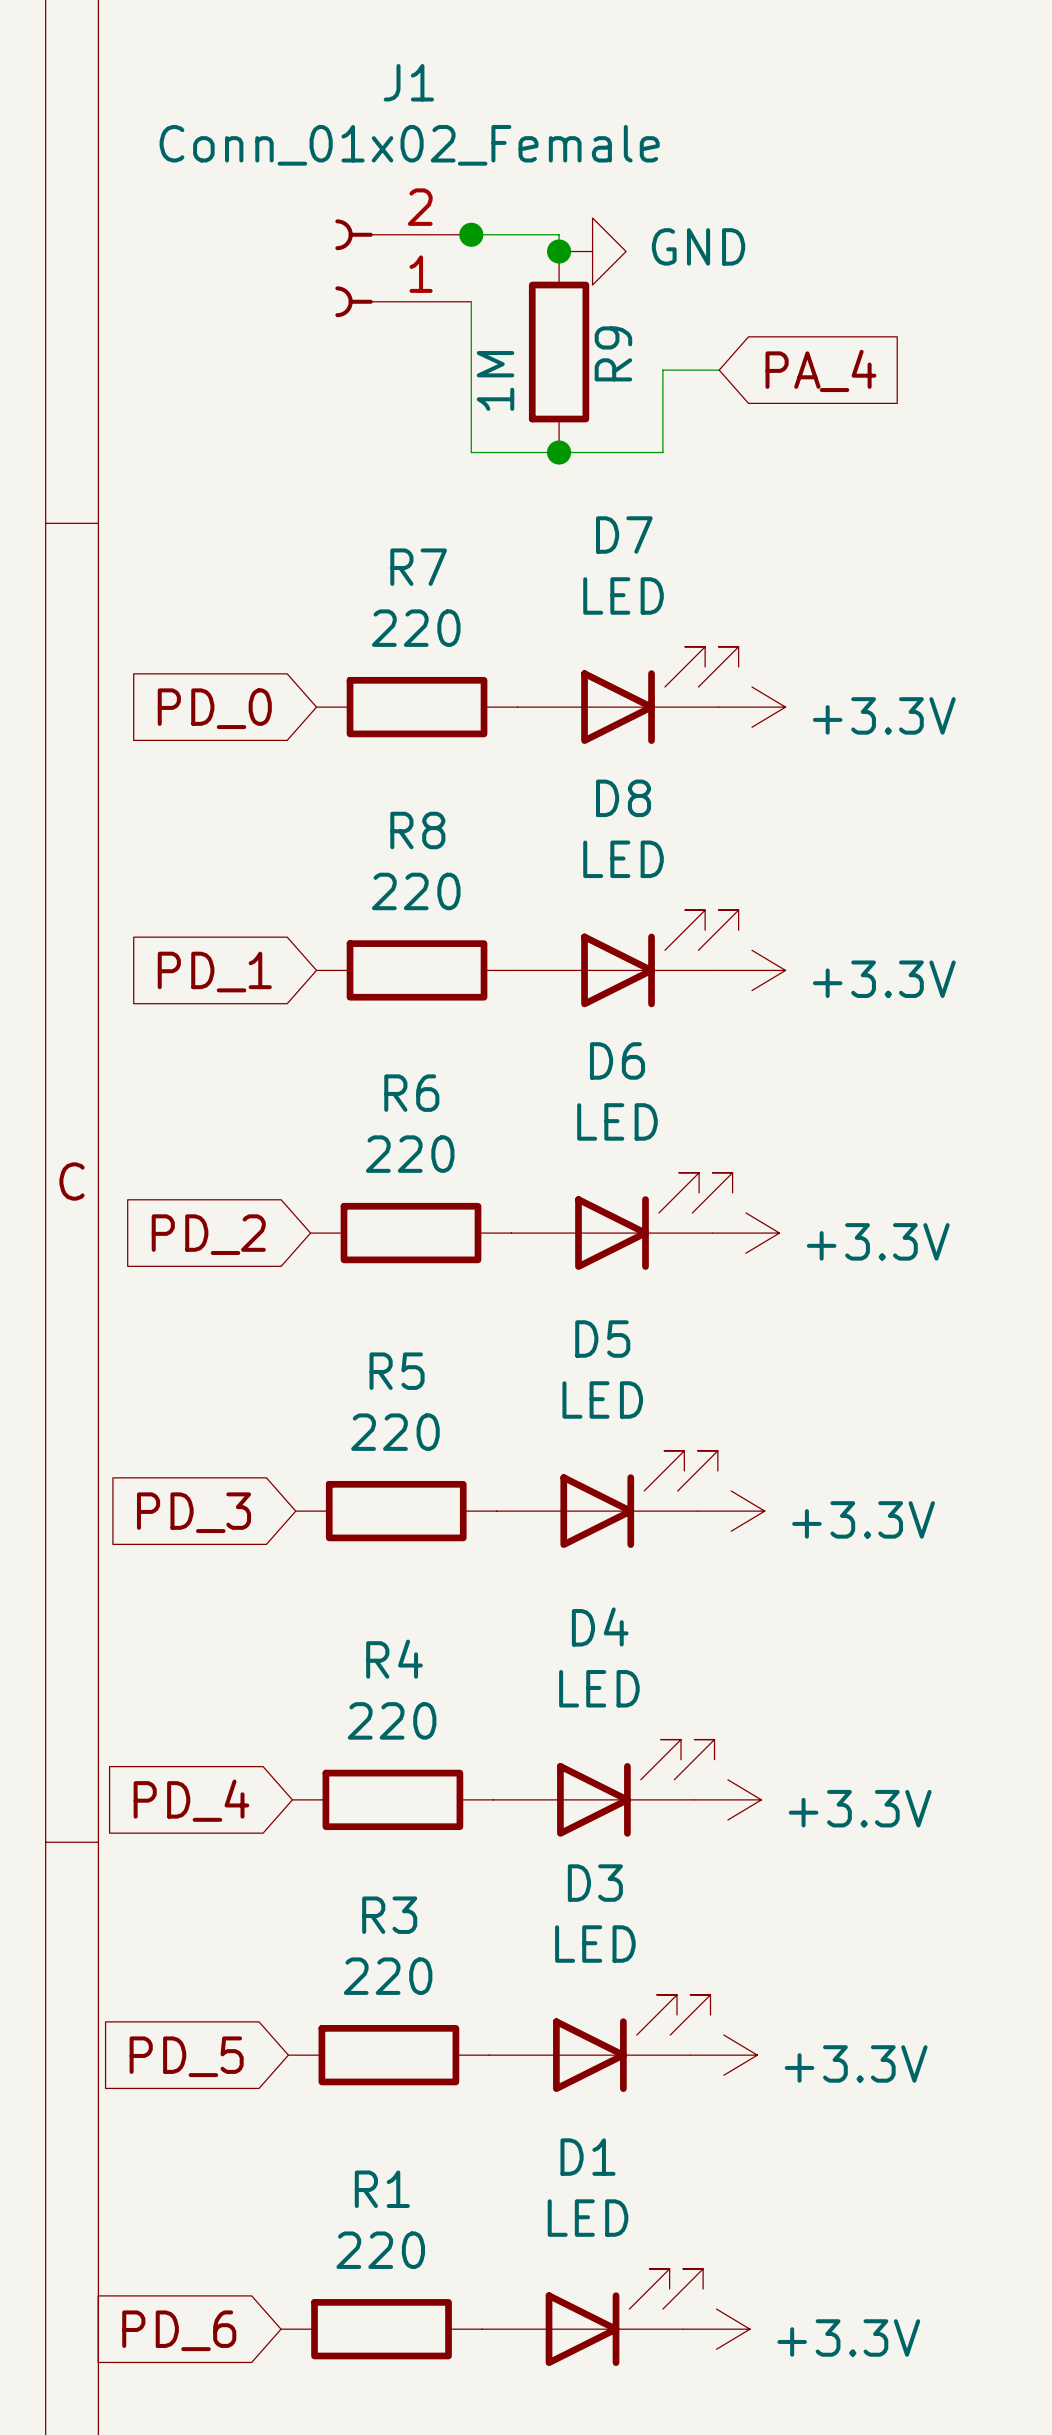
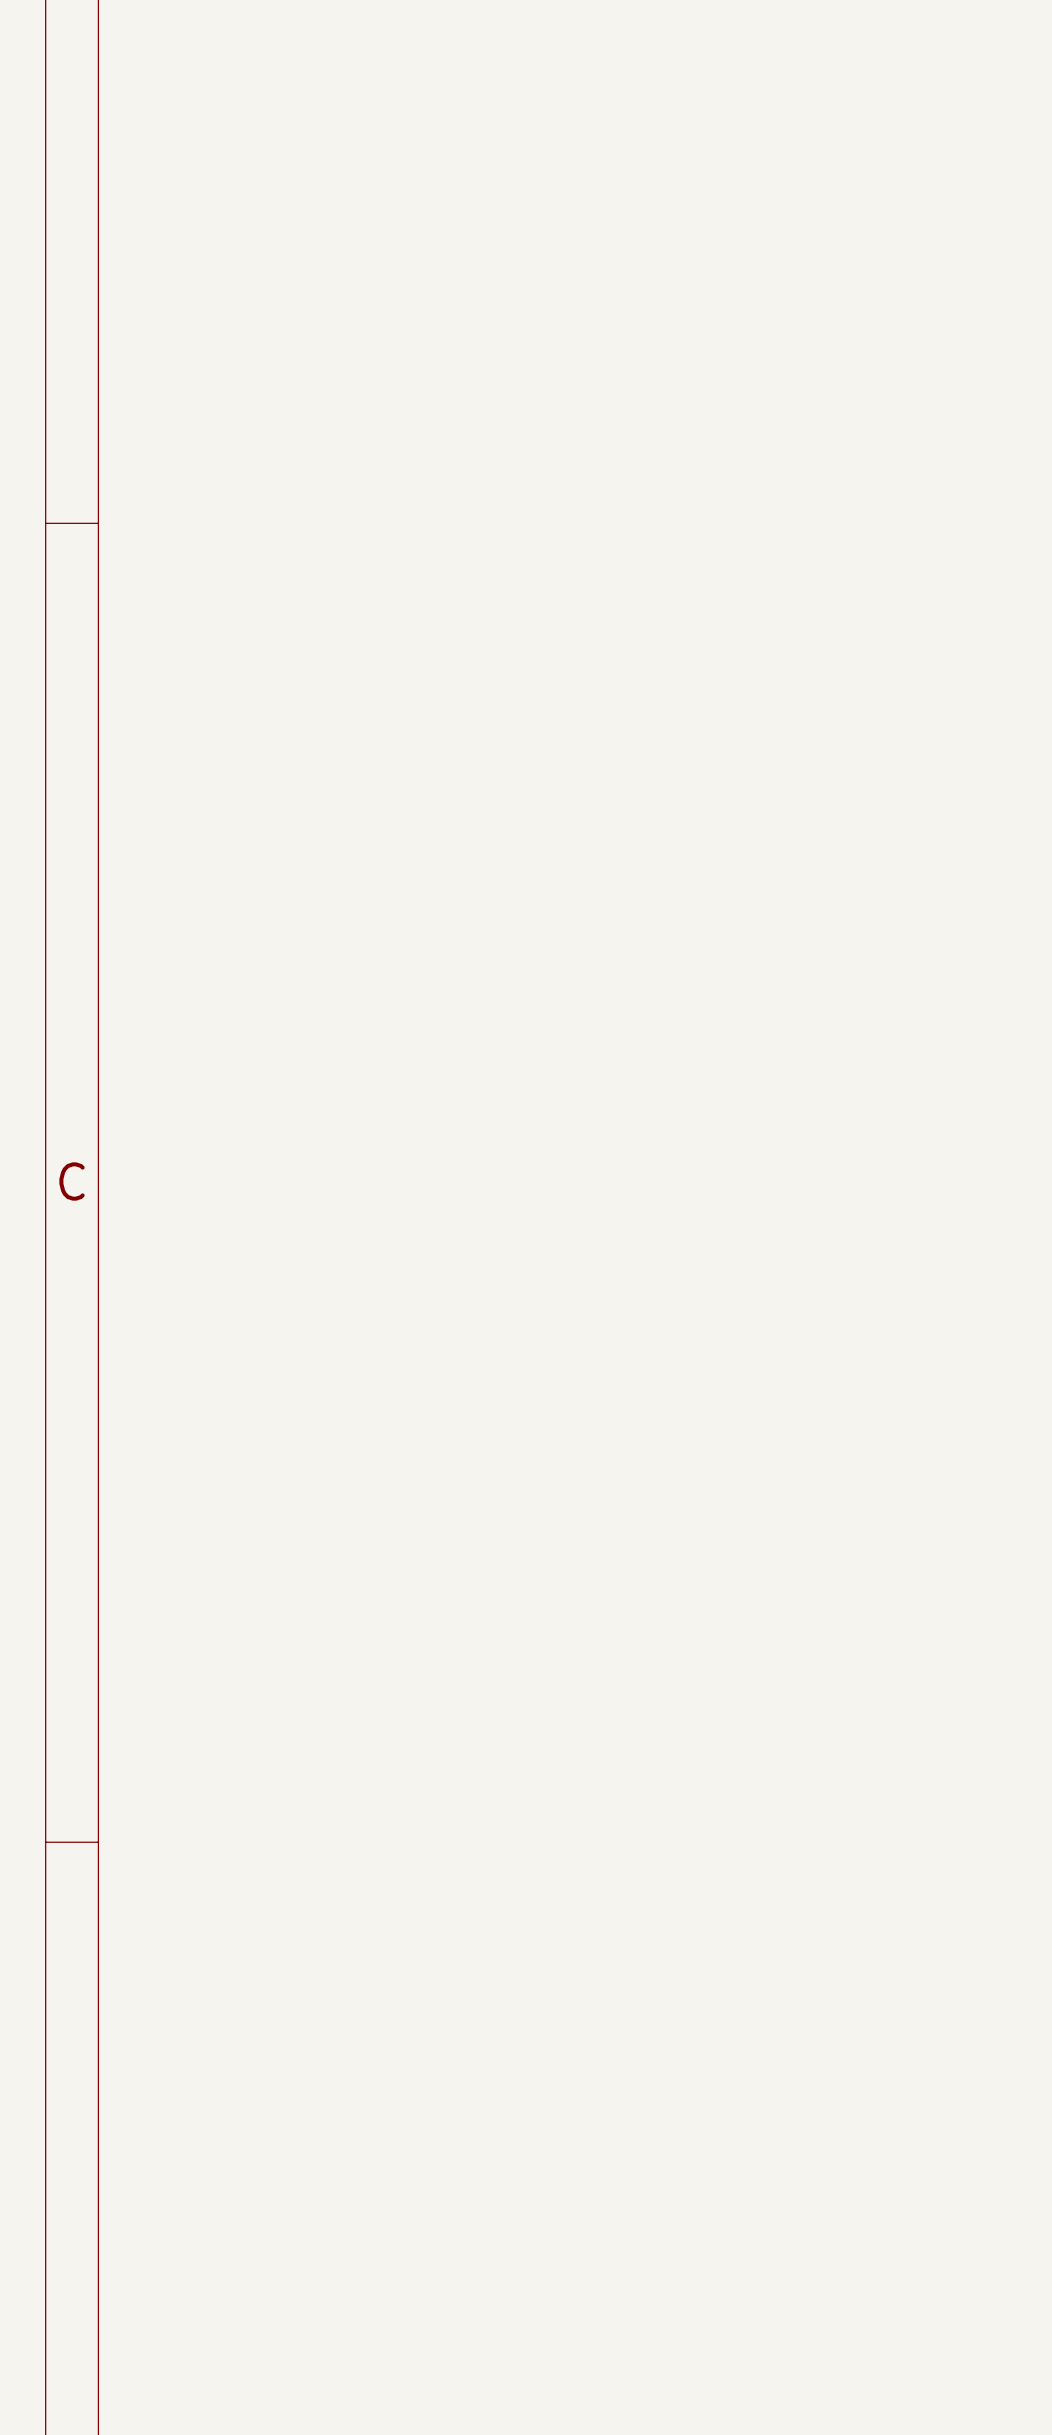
wire: (470, 234) (559, 234) (559, 252) -> none
junction: (471, 234) -> none
junction: (559, 251) -> none
power symbol: GND (592, 251) -> none
J1: Conn_01x02_Female (403, 268) -> none
wire: (471, 301) (471, 452) (662, 452) (662, 370) (719, 370) -> none
R9: 1M (559, 352) -> none
global label: PA_4 (820, 370) -> none
junction: (559, 452) -> none
D7: LED (628, 695) -> none
R7: 220 (417, 707) -> none
power symbol: +3.3V (752, 707) -> none
global label: PD_0 (214, 708) -> none
D8: LED (628, 958) -> none
R8: 220 (417, 970) -> none
power symbol: +3.3V (752, 970) -> none
global label: PD_1 (214, 972) -> none
D6: LED (622, 1221) -> none
R6: 220 (411, 1233) -> none
power symbol: +3.3V (746, 1233) -> none
global label: PD_2 (208, 1234) -> none
D5: LED (607, 1499) -> none
R5: 220 (396, 1511) -> none
power symbol: +3.3V (731, 1511) -> none
global label: PD_3 (194, 1512) -> none
D4: LED (603, 1788) -> none
R4: 220 (392, 1799) -> none
power symbol: +3.3V (727, 1799) -> none
global label: PD_4 (191, 1800) -> none
D3: LED (599, 2043) -> none
R3: 220 (388, 2055) -> none
power symbol: +3.3V (723, 2055) -> none
global label: PD_5 (186, 2056) -> none
D1: LED (592, 2317) -> none
R1: 220 (381, 2329) -> none
power symbol: +3.3V (716, 2329) -> none
global label: PD_6 (179, 2330) -> none

